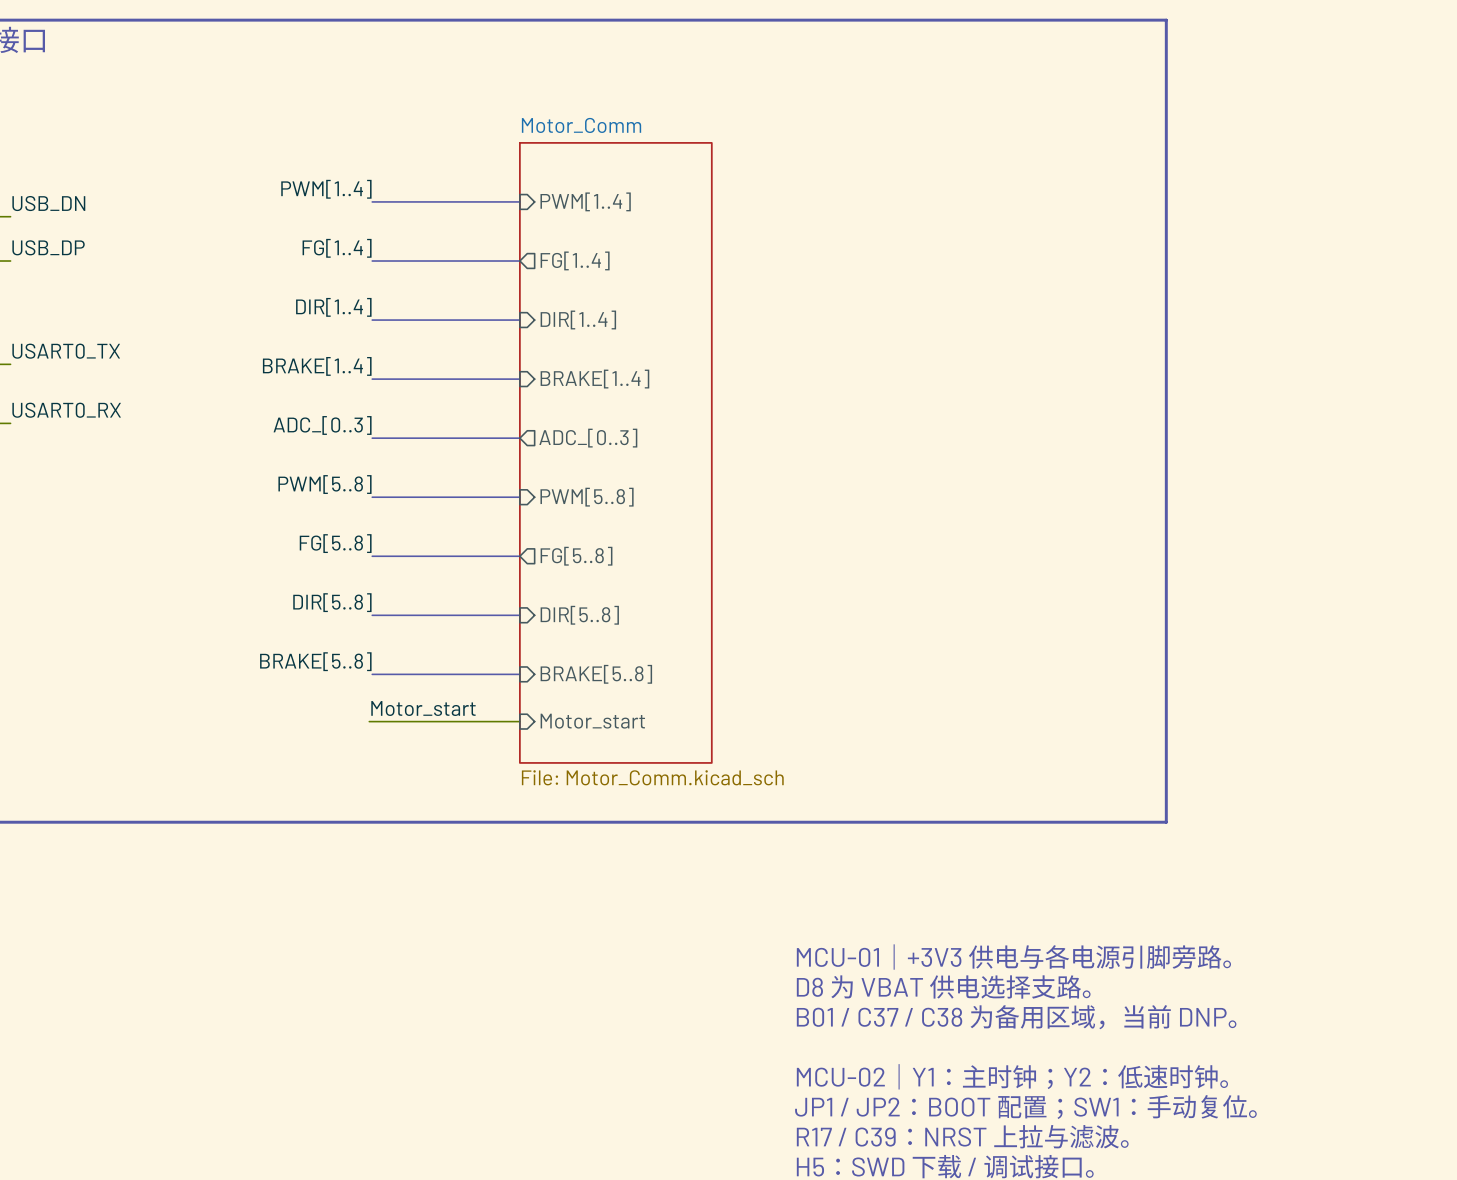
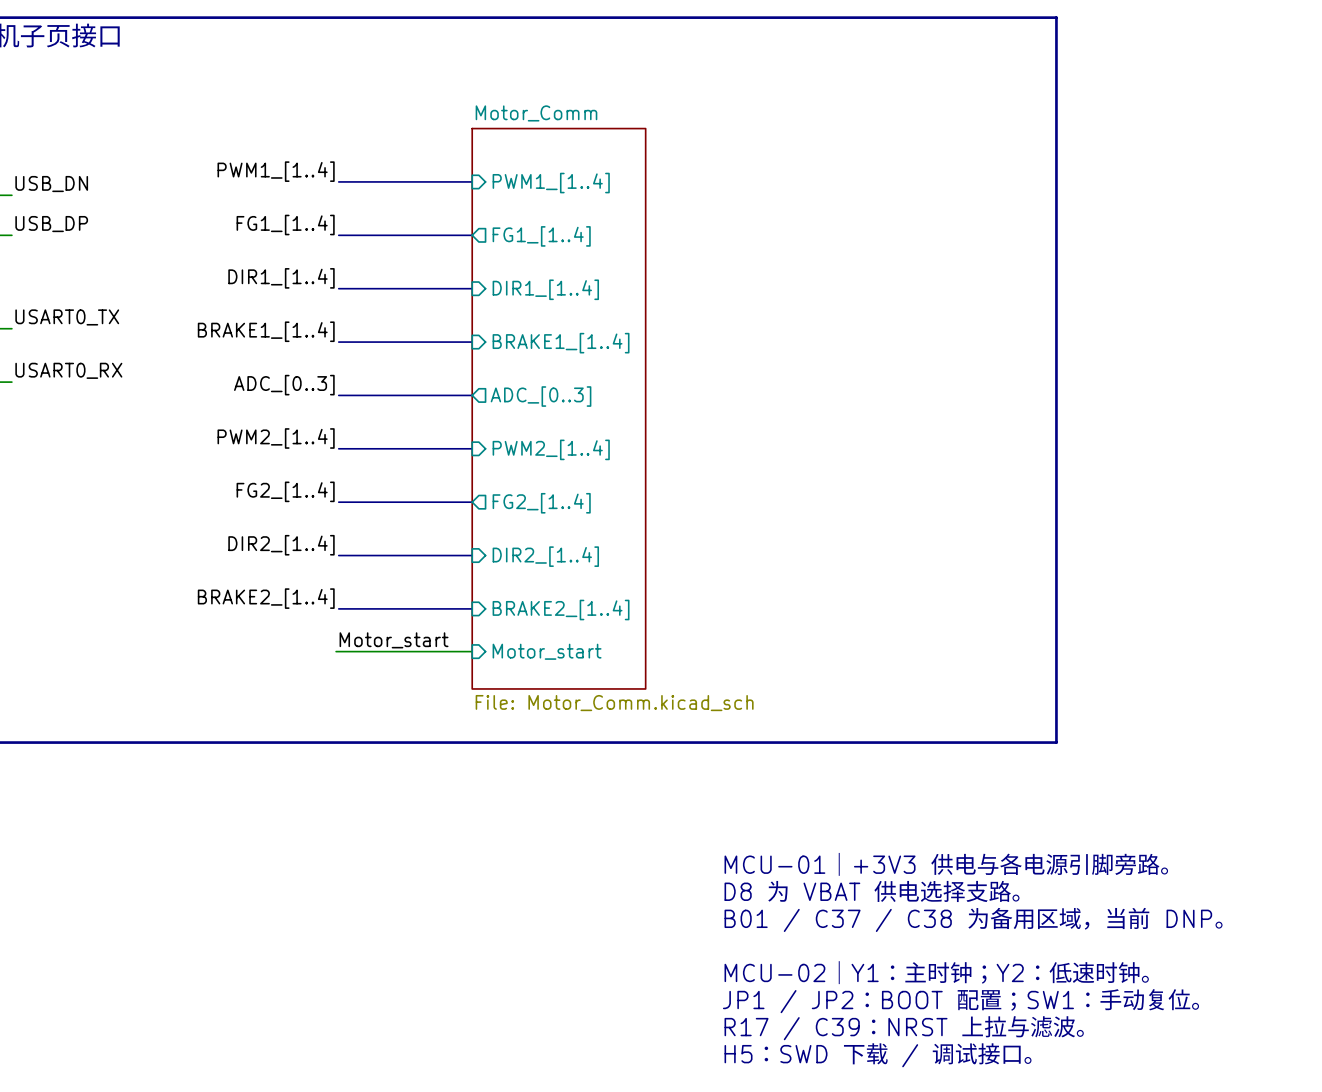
label: PWM[1..4] (326, 189) -> PWM1_[1..4] (276, 171)
sheet pin: PWM[1..4] (585, 201) -> PWM1_[1..4] (551, 183)
label: FG[1..4] (337, 248) -> FG1_[1..4] (285, 225)
sheet pin: FG[1..4] (575, 260) -> FG1_[1..4] (541, 236)
label: DIR[1..4] (333, 307) -> DIR1_[1..4] (281, 278)
sheet pin: DIR[1..4] (578, 319) -> DIR1_[1..4] (545, 289)
label: BRAKE[1..4] (317, 366) -> BRAKE1_[1..4] (266, 331)
sheet pin: BRAKE[1..4] (594, 379) -> BRAKE1_[1..4] (561, 343)
label: PWM[5..8] (324, 484) -> PWM2_[1..4] (276, 438)
sheet pin: PWM[5..8] (587, 497) -> PWM2_[1..4] (551, 449)
label: FG[5..8] (335, 543) -> FG2_[1..4] (285, 491)
sheet pin: FG[5..8] (576, 556) -> FG2_[1..4] (541, 503)
label: DIR[5..8] (332, 602) -> DIR2_[1..4] (281, 545)
sheet pin: DIR[5..8] (579, 615) -> DIR2_[1..4] (545, 556)
label: BRAKE[5..8] (315, 661) -> BRAKE2_[1..4] (266, 598)
sheet pin: BRAKE[5..8] (596, 674) -> BRAKE2_[1..4] (561, 610)

